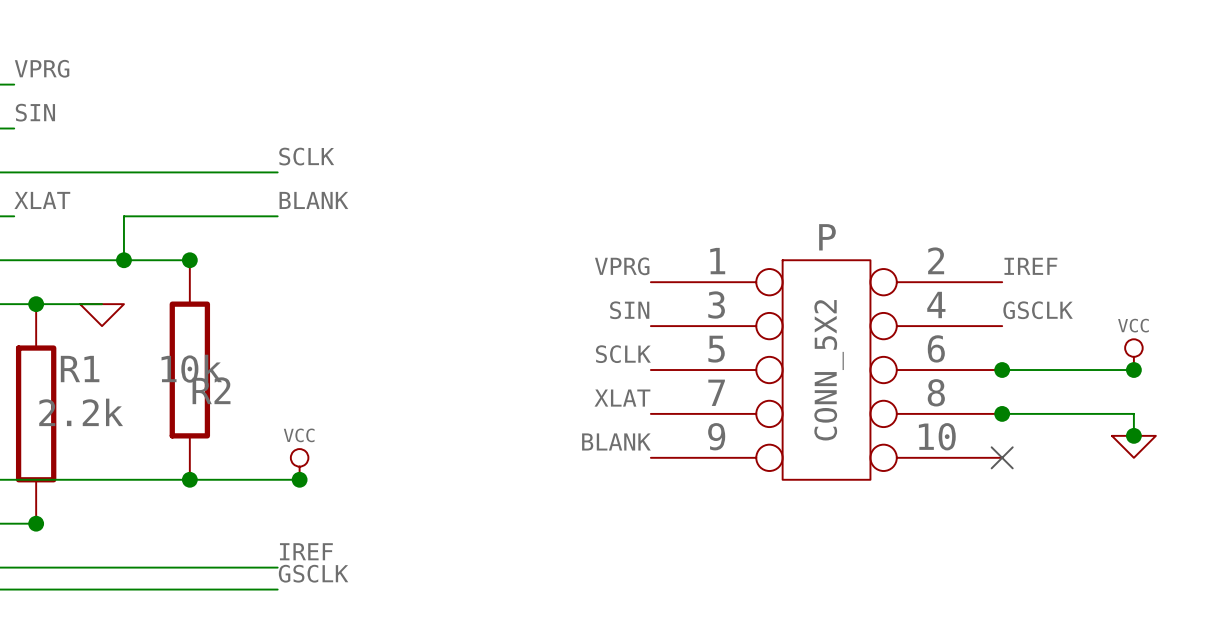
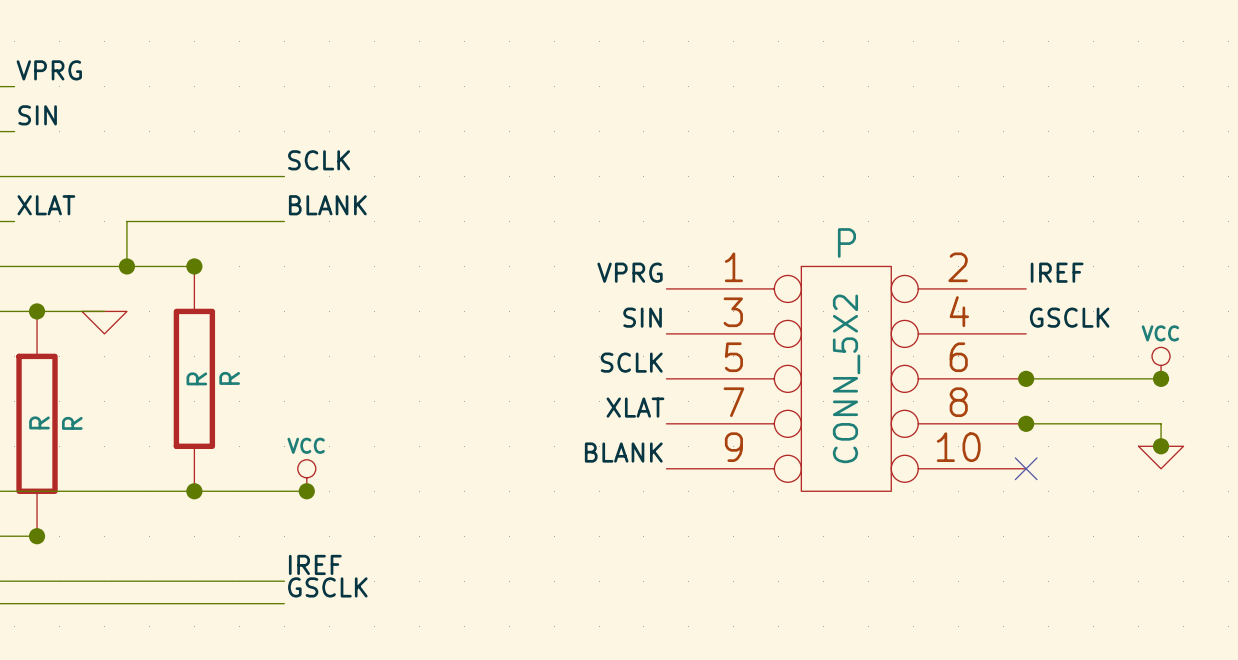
R2 value: 10k (191, 368) -> none
R1 name: R1 (80, 369) -> none
R2 text: none -> R (196, 378)
R2 text: none -> R (229, 378)
R2 name: R2 (211, 390) -> none
R1 text: none -> R (39, 422)
R1 value: 2.2k (81, 412) -> none
R1 text: none -> R (72, 423)

